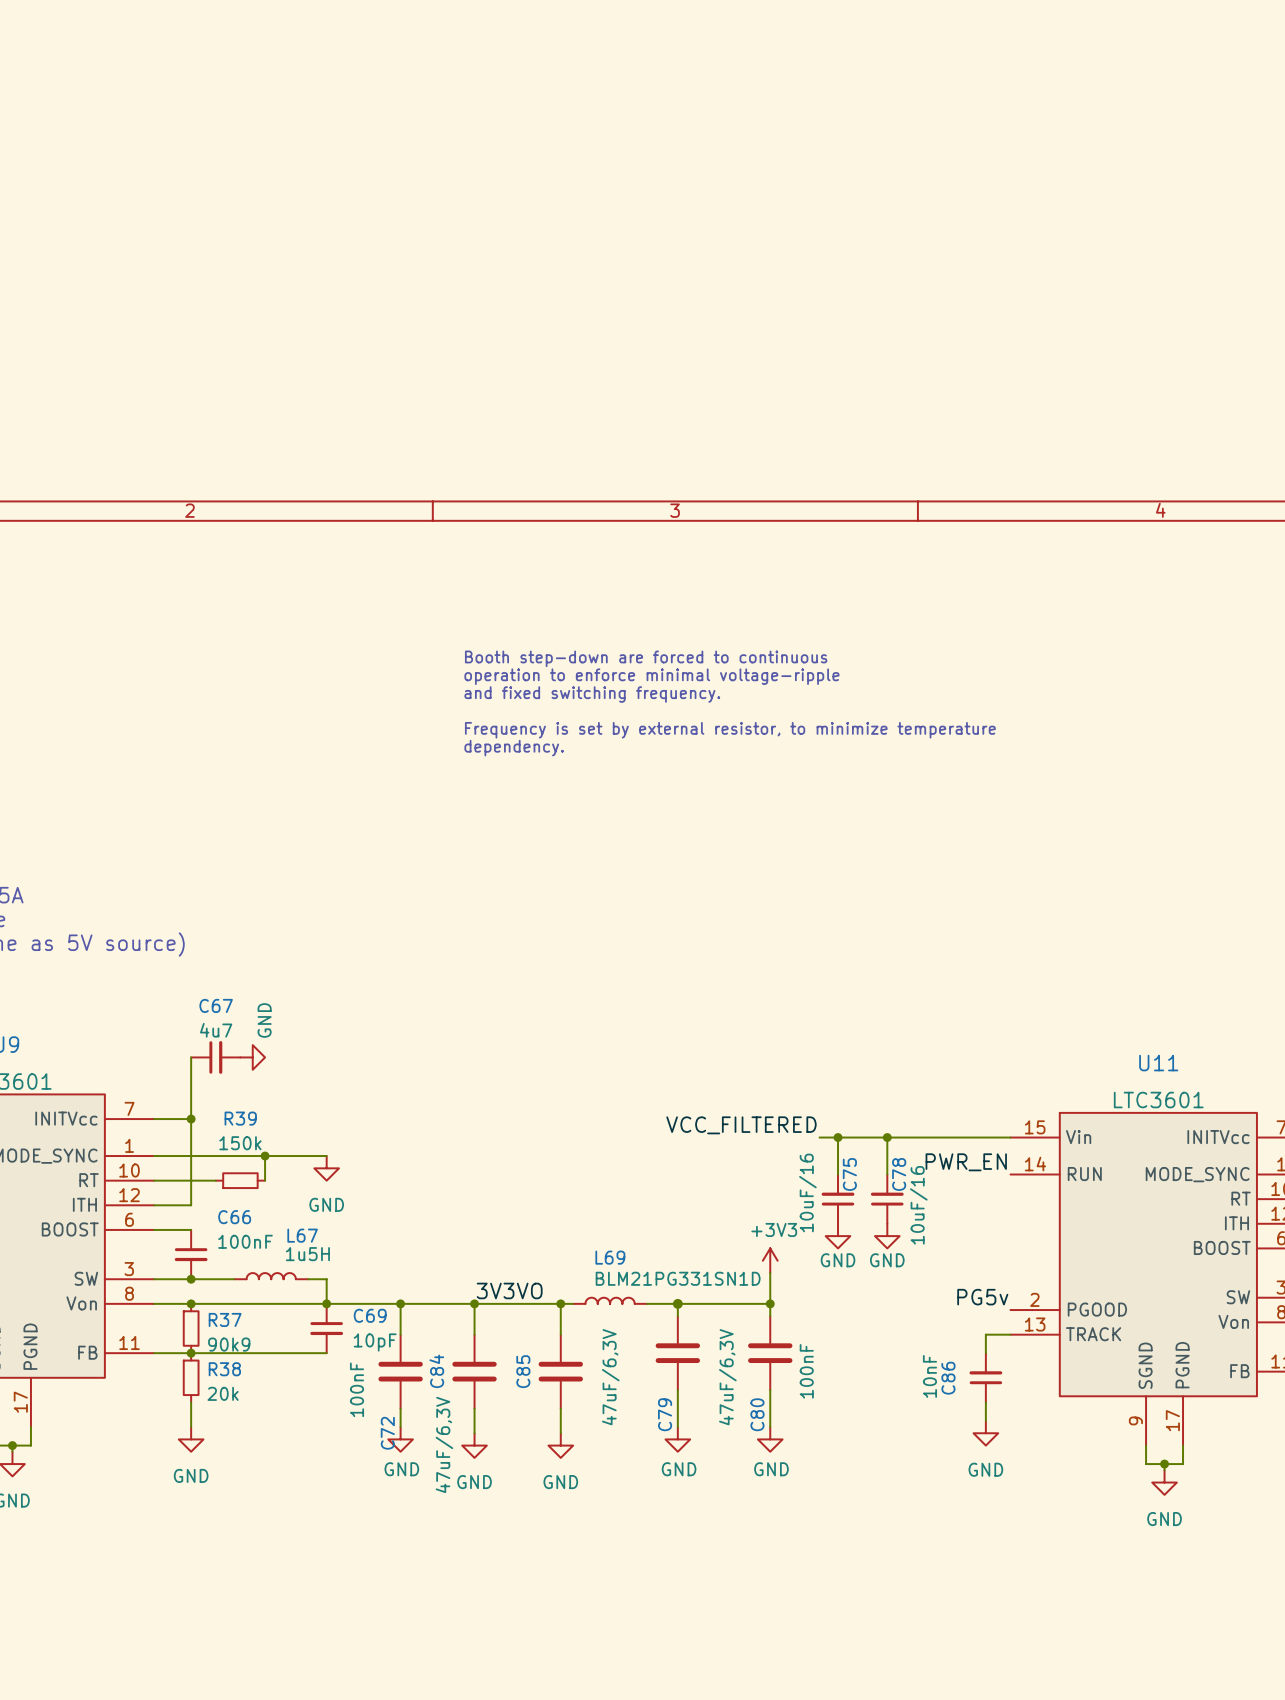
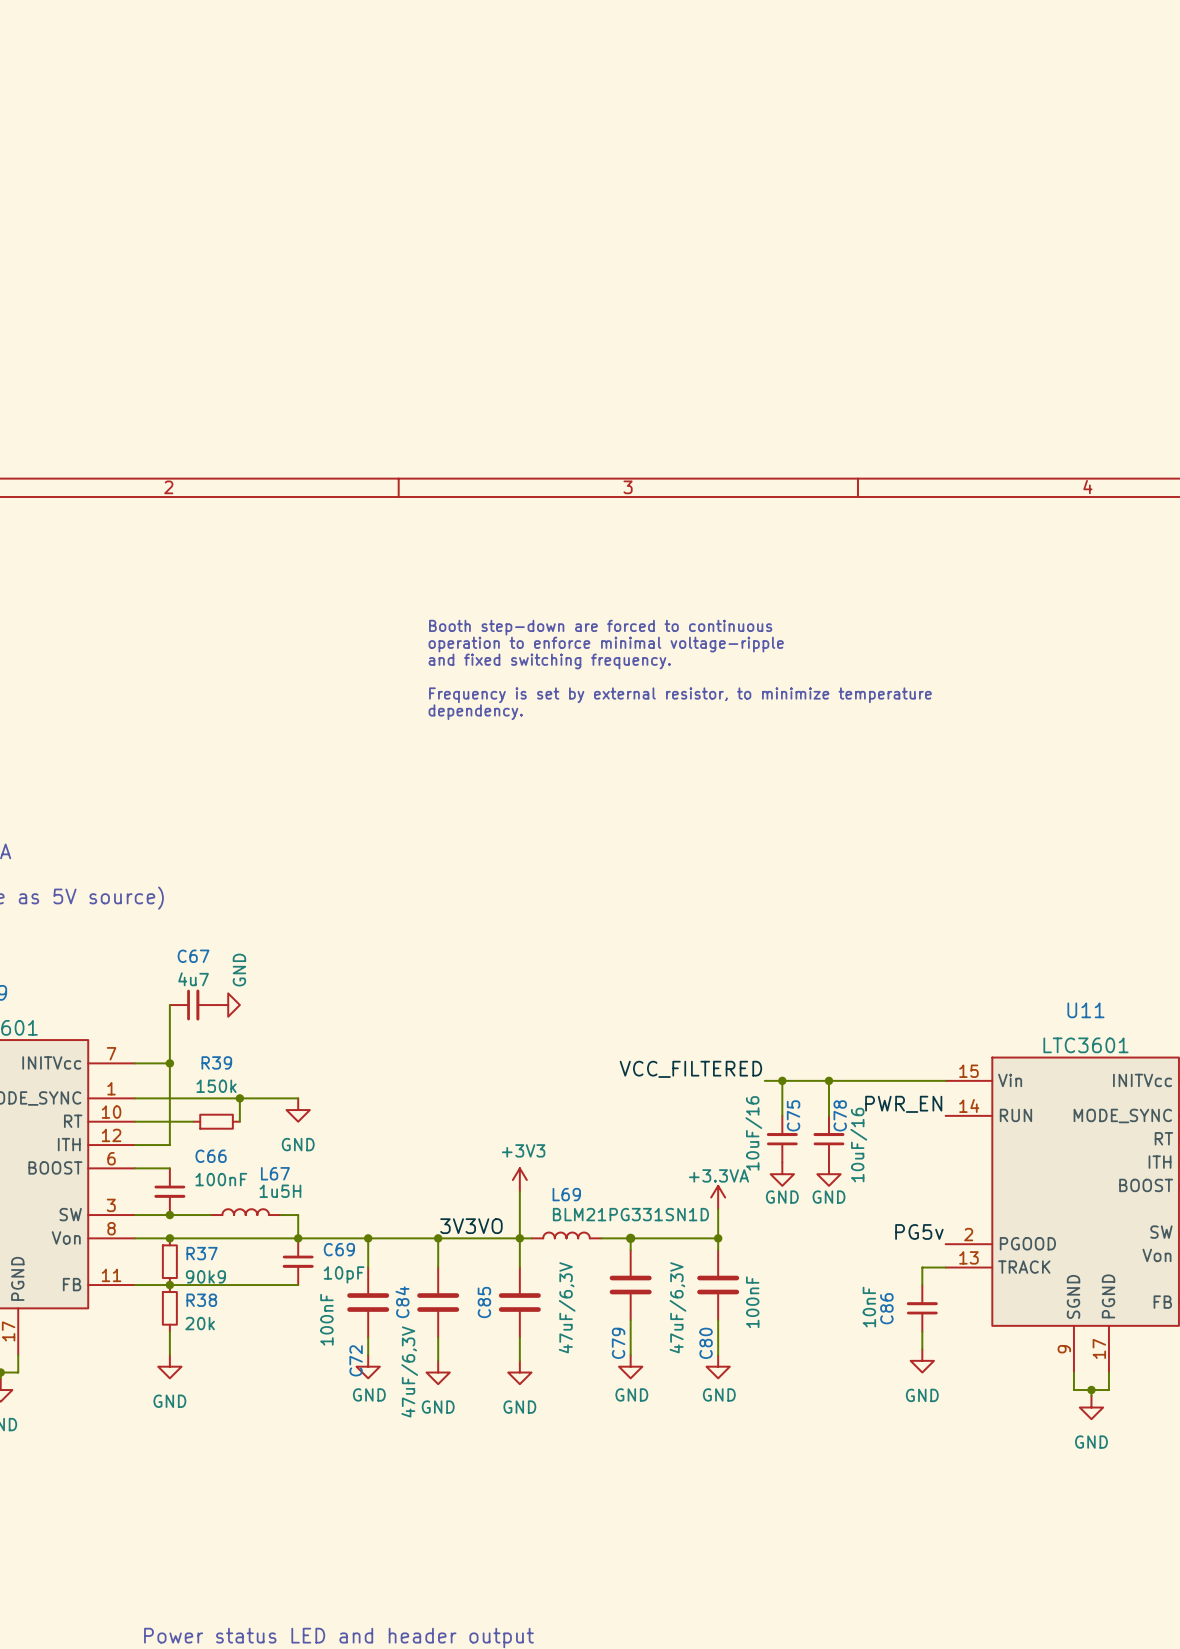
power symbol: none -> +3V3 (519, 1180)
wire: none -> (519, 1191) (519, 1238)
power symbol: +3V3 (770, 1260) -> +3.3VA (718, 1197)

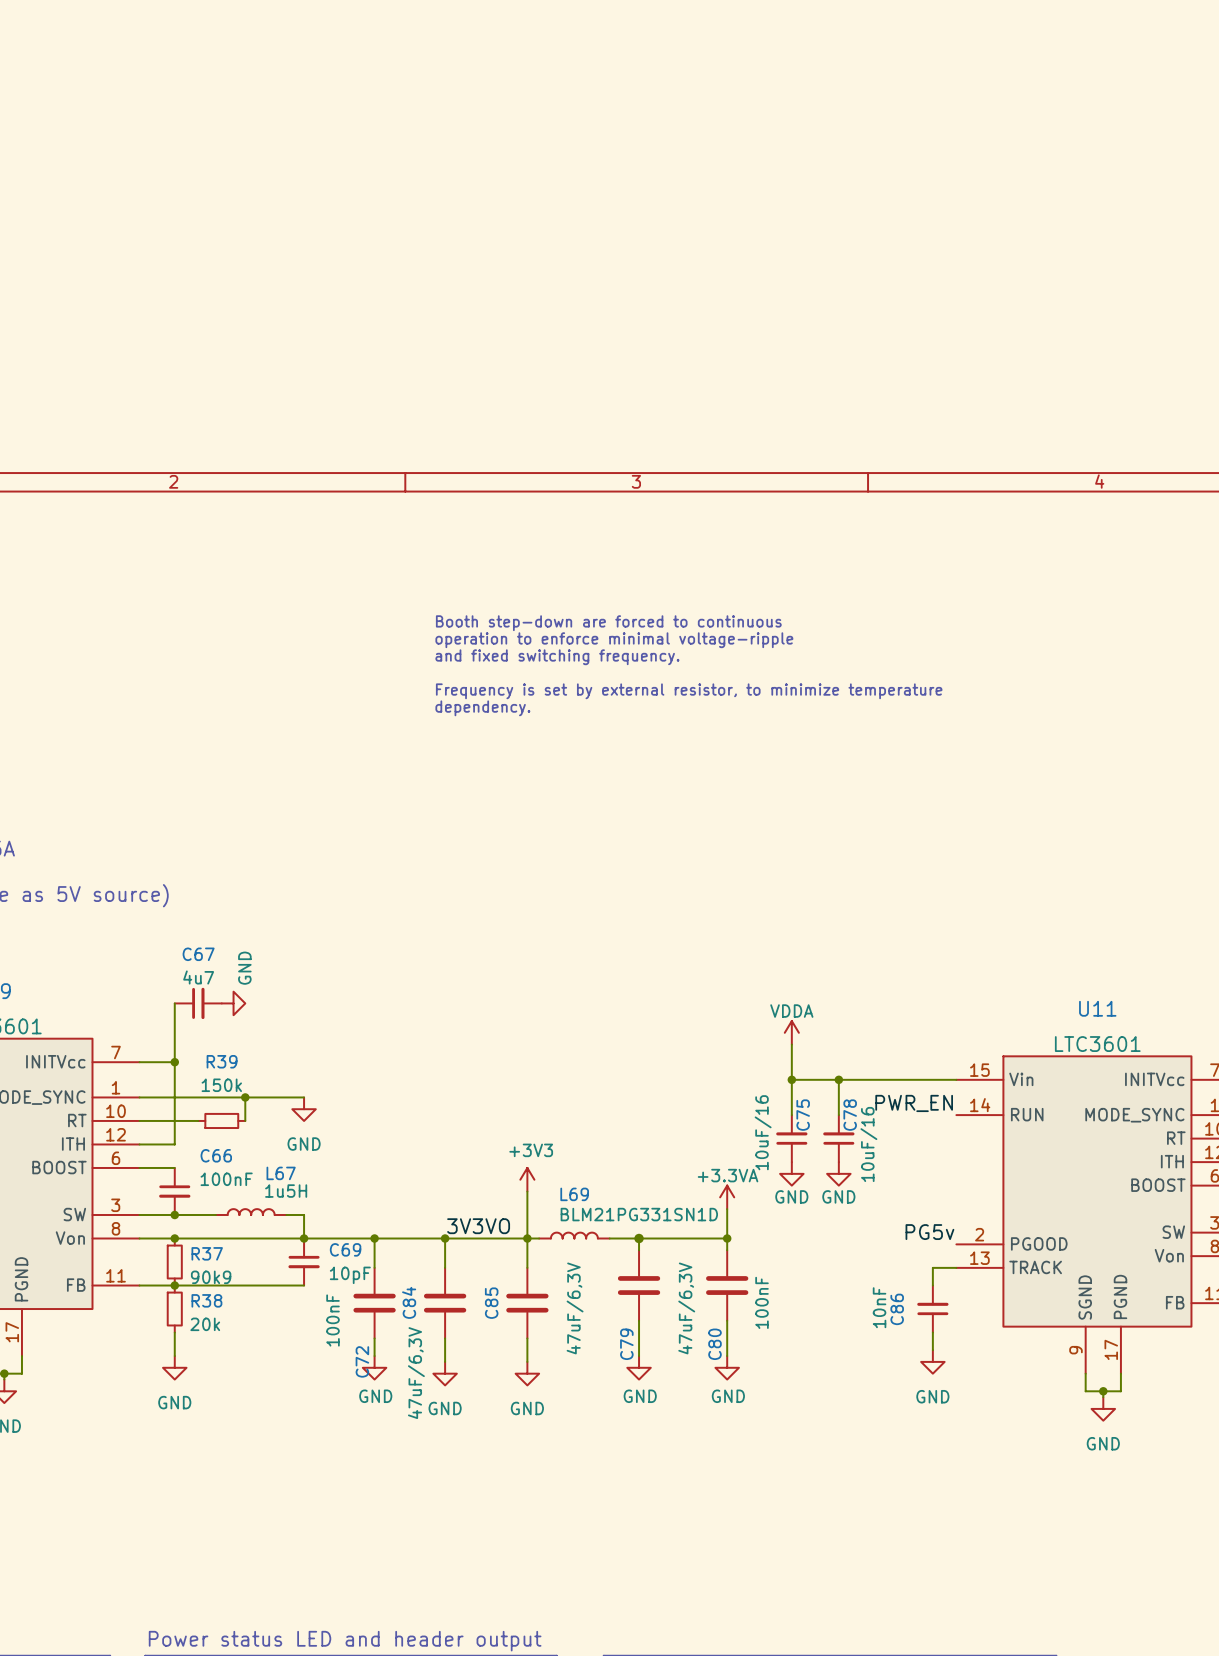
power symbol: none -> VDDA (791, 1032)
label: VCC_FILTERED (690, 1069) -> none
wire: (764, 1080) (782, 1080) -> (791, 1044) (791, 1079)

